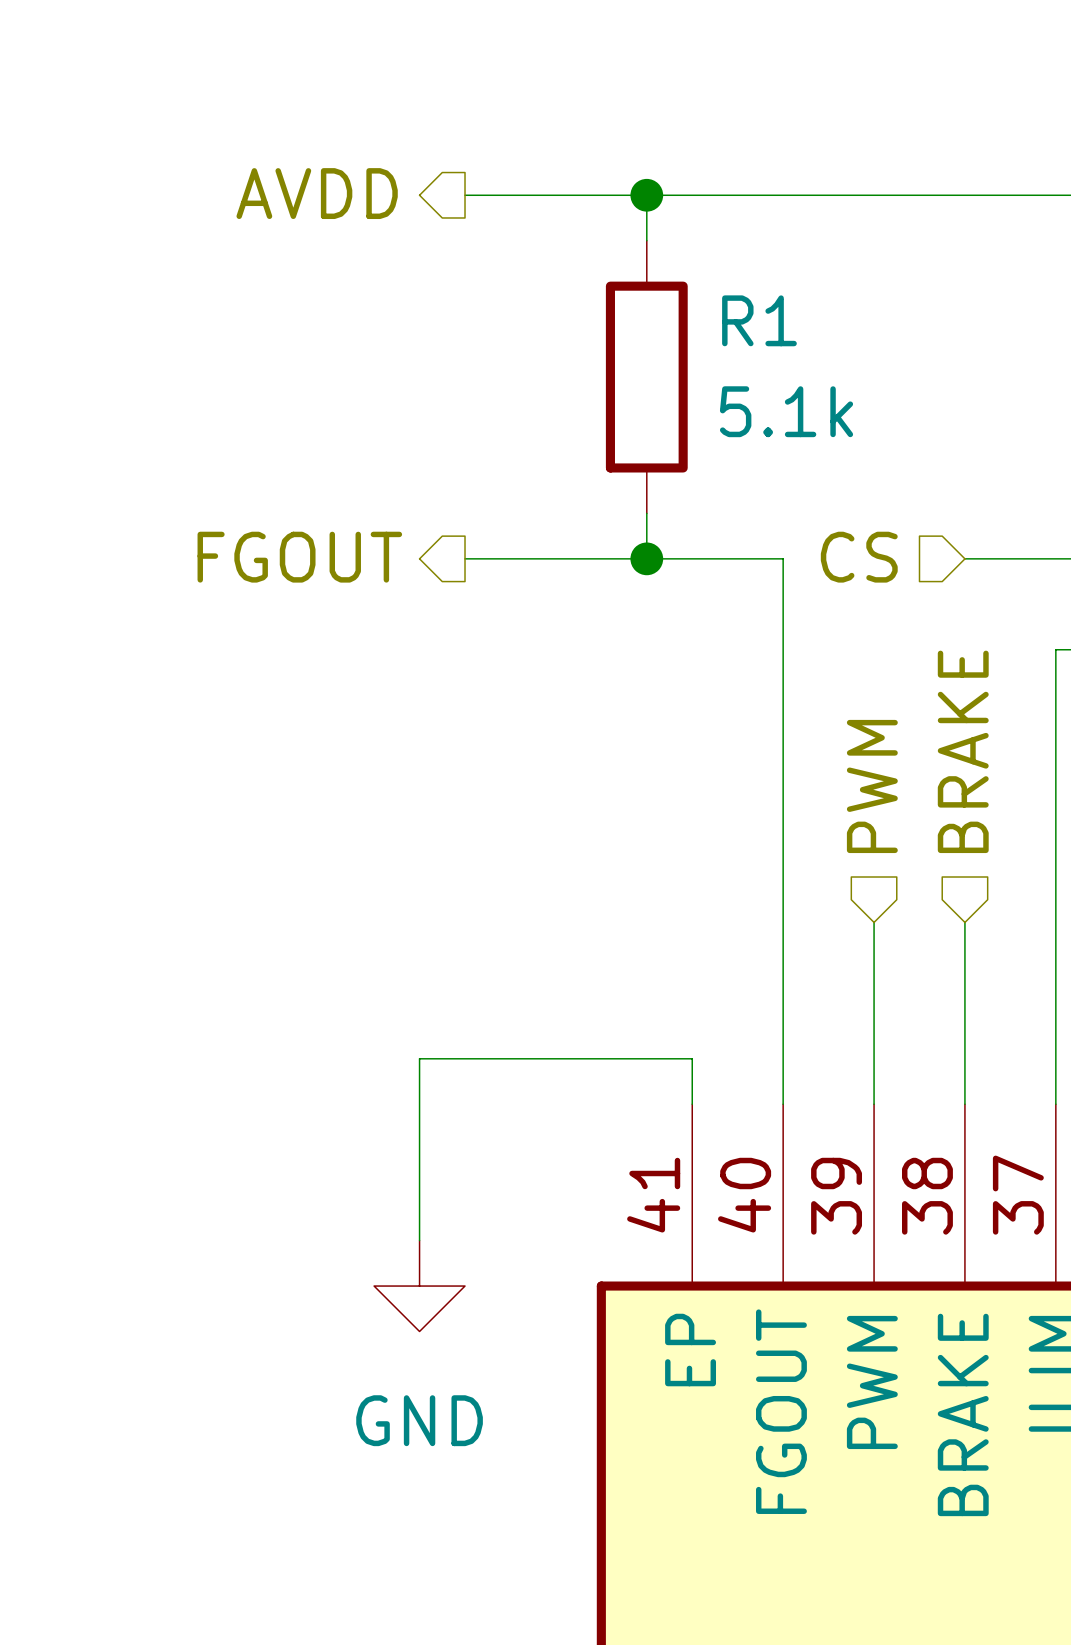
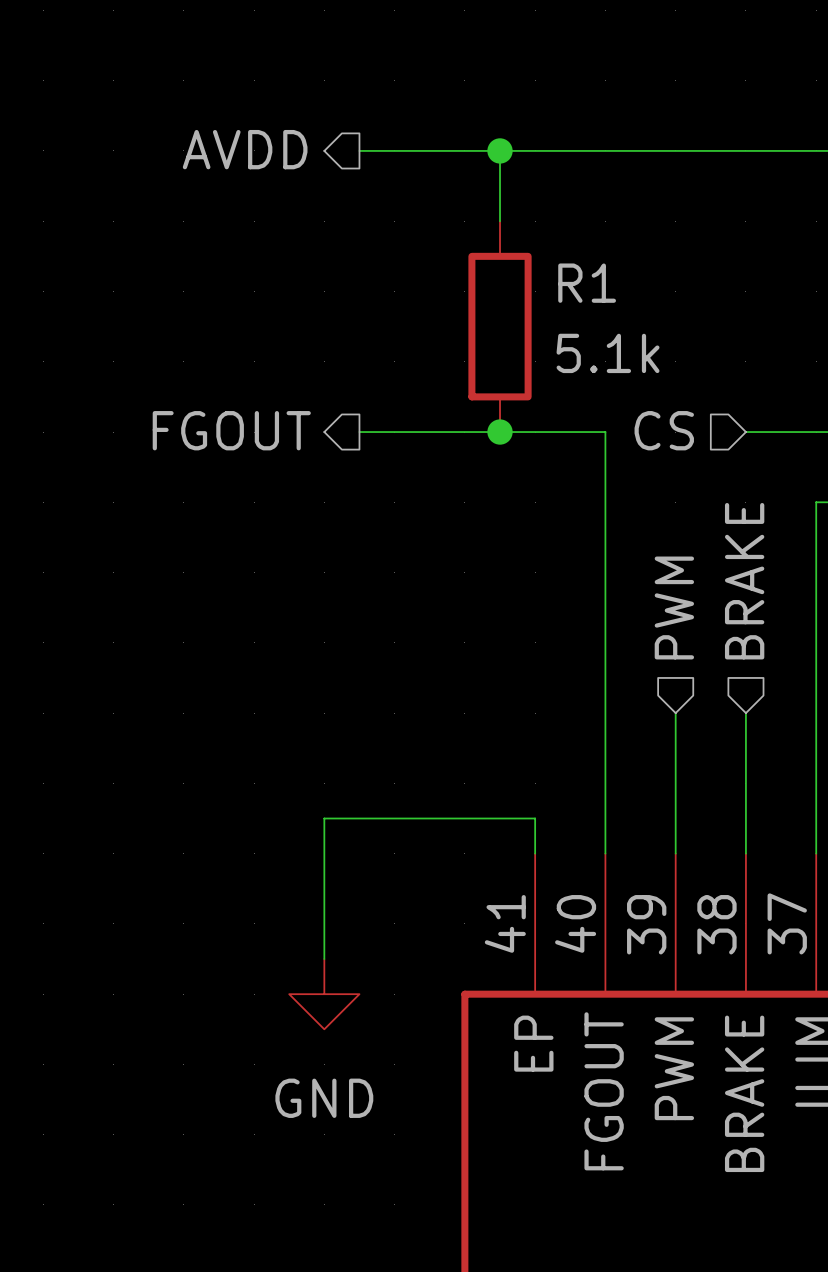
R1 position: (646, 377) -> (500, 326)

